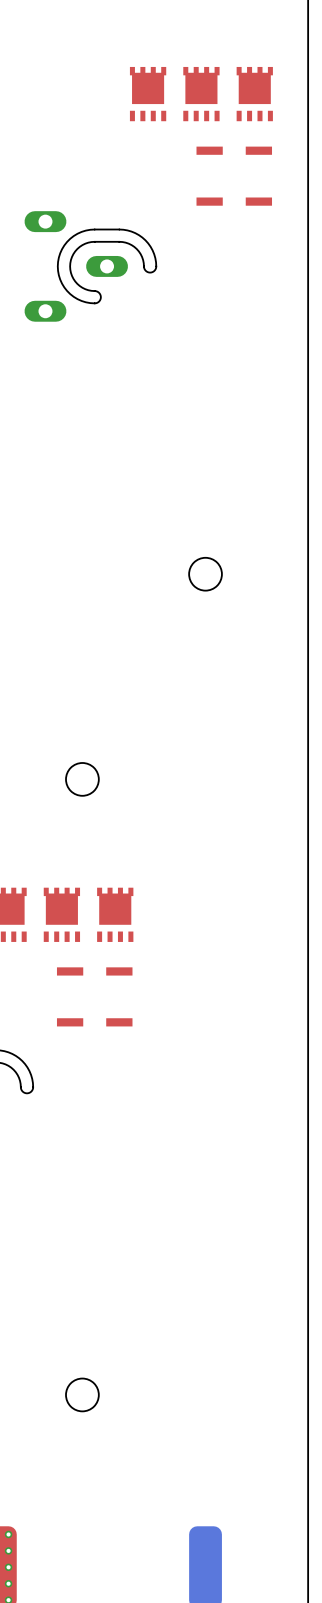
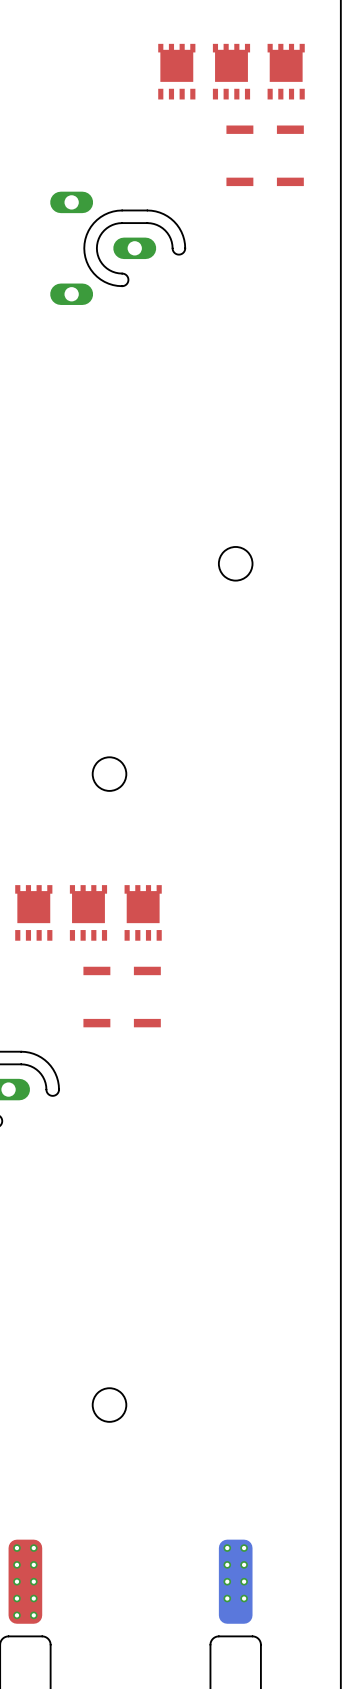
via: none -> (227, 1548)
via: none -> (244, 1548)
via: none -> (227, 1564)
via: none -> (244, 1564)
via: none -> (227, 1581)
via: none -> (244, 1581)
via: none -> (227, 1598)
via: none -> (244, 1598)

